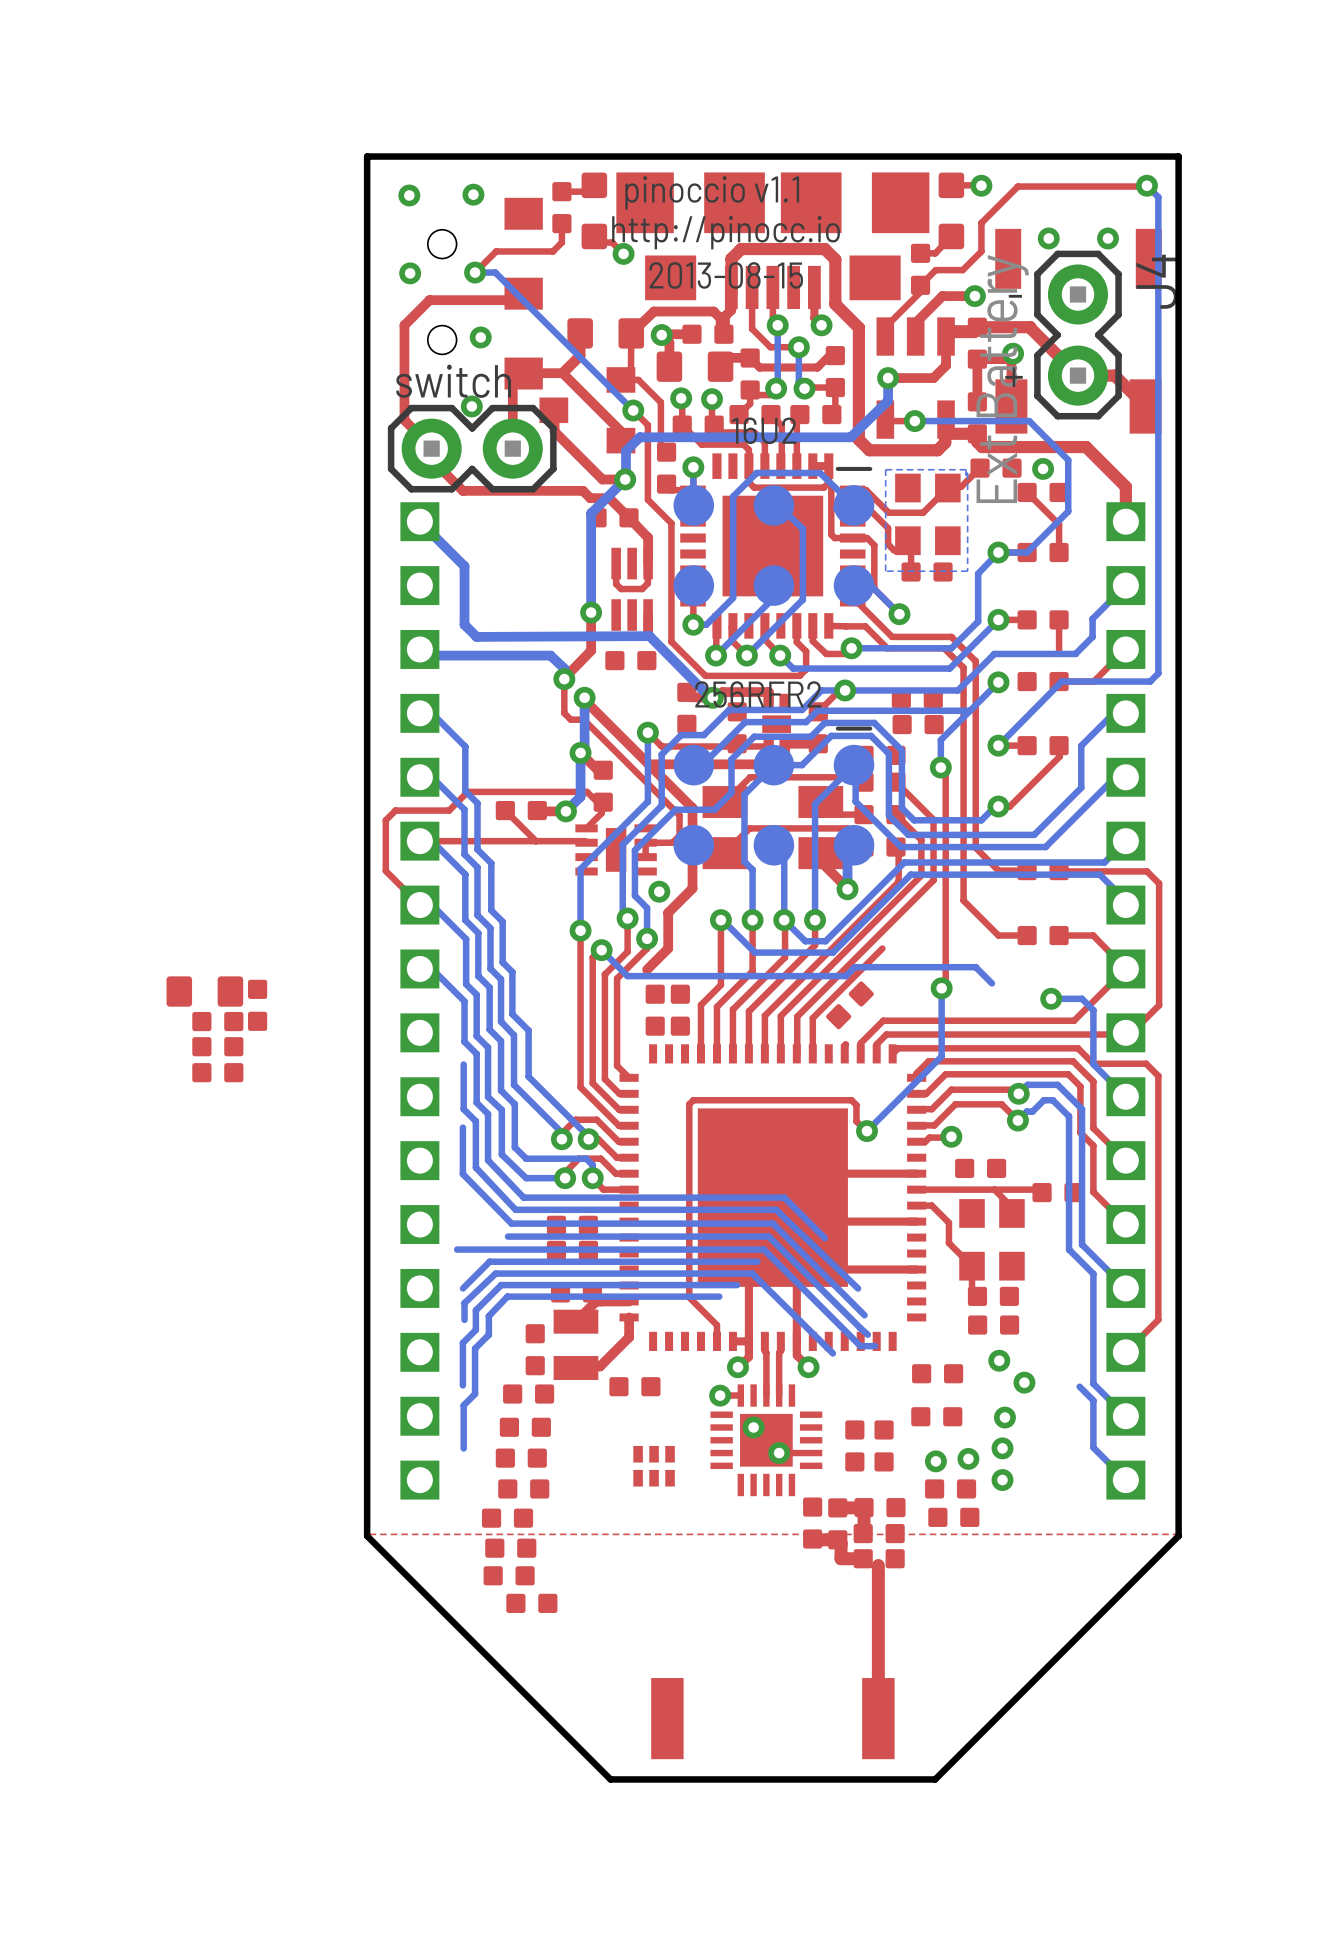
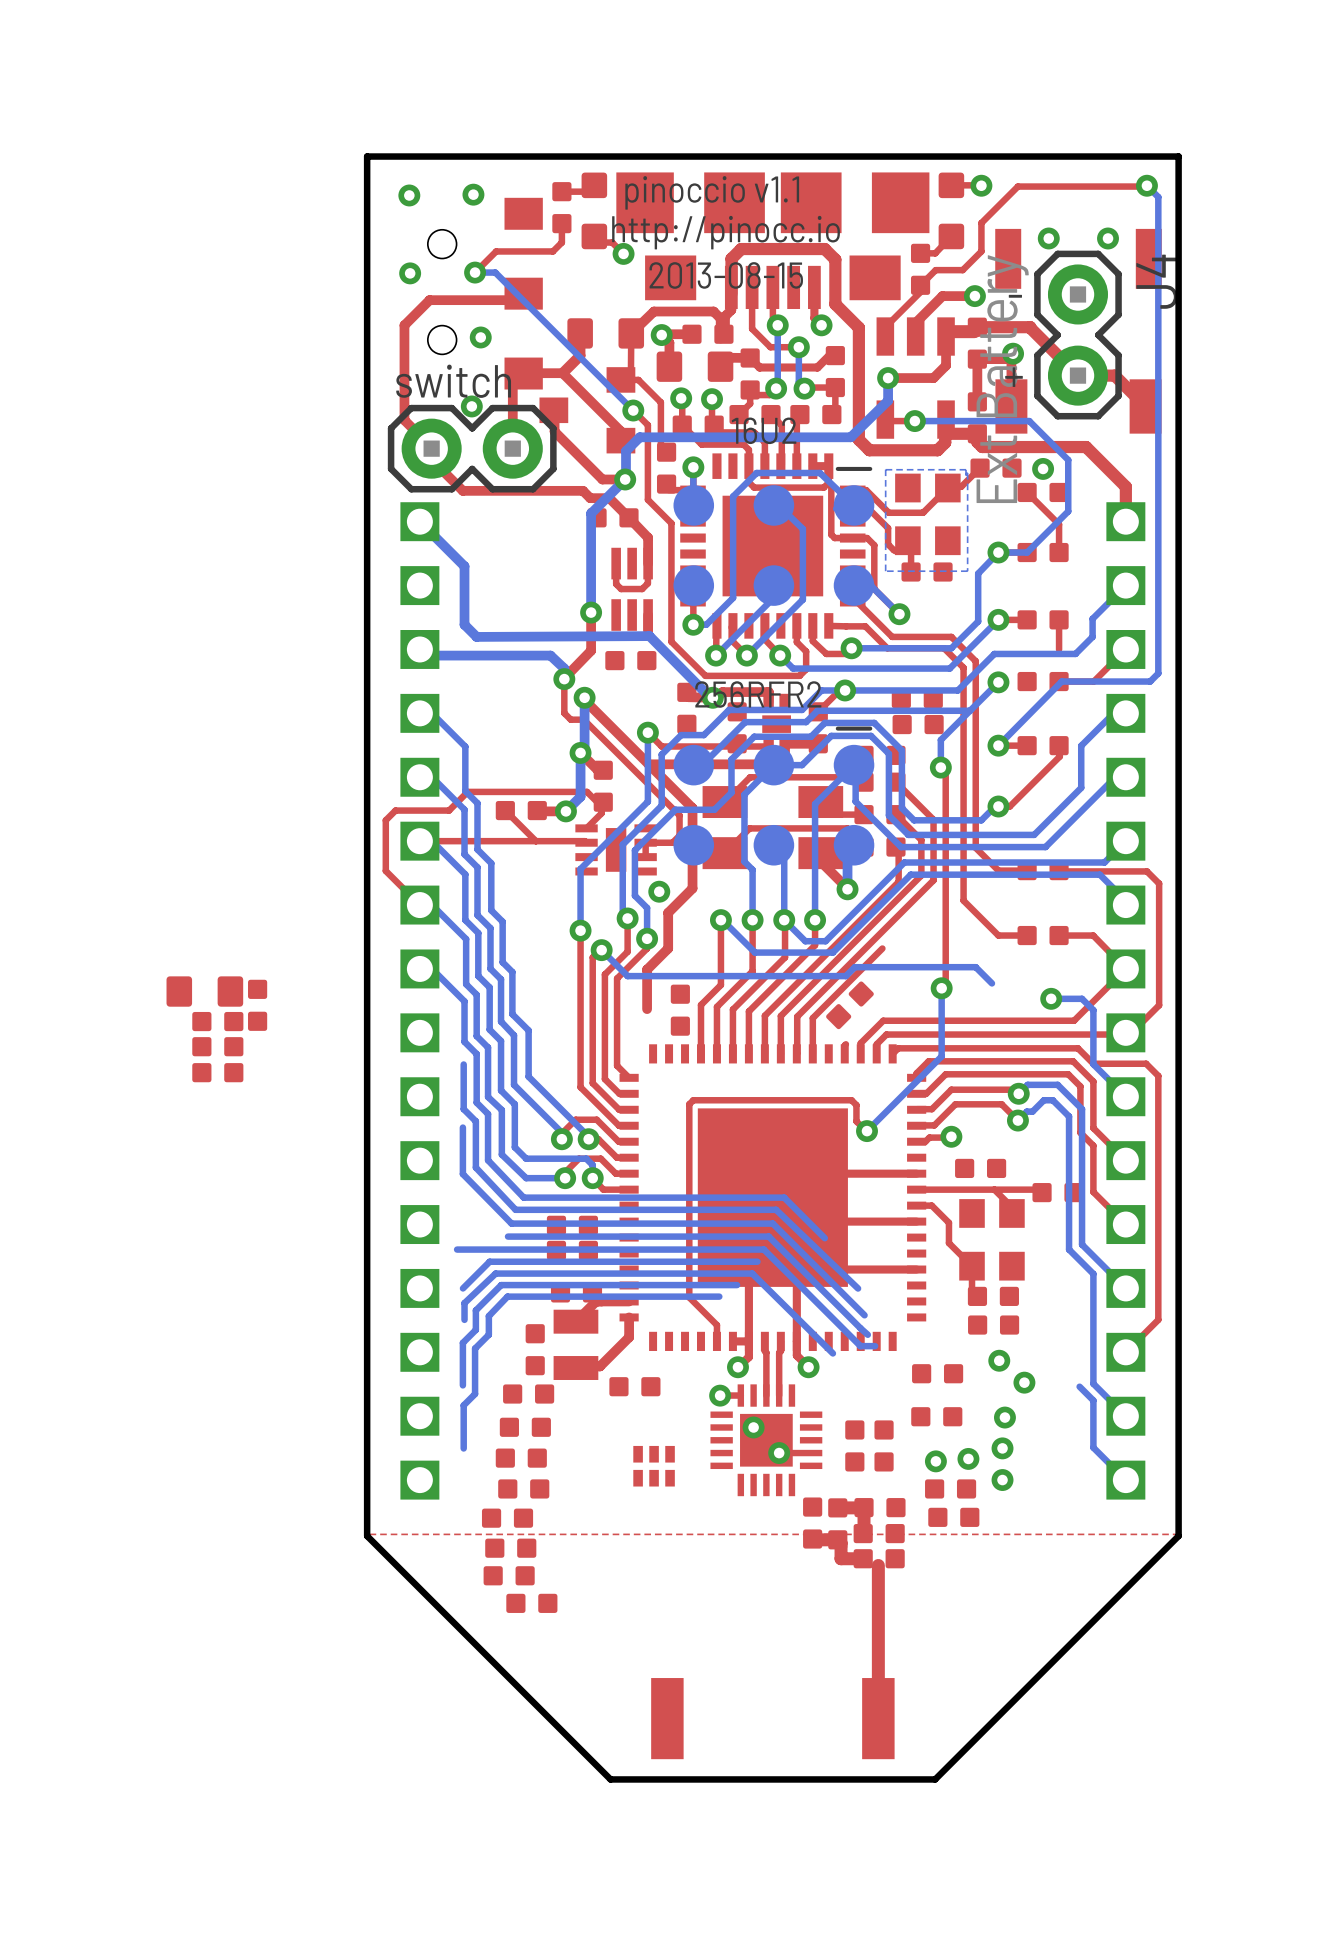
top track: none -> (647, 969) (647, 1009)
part: (655, 1010) -> none

